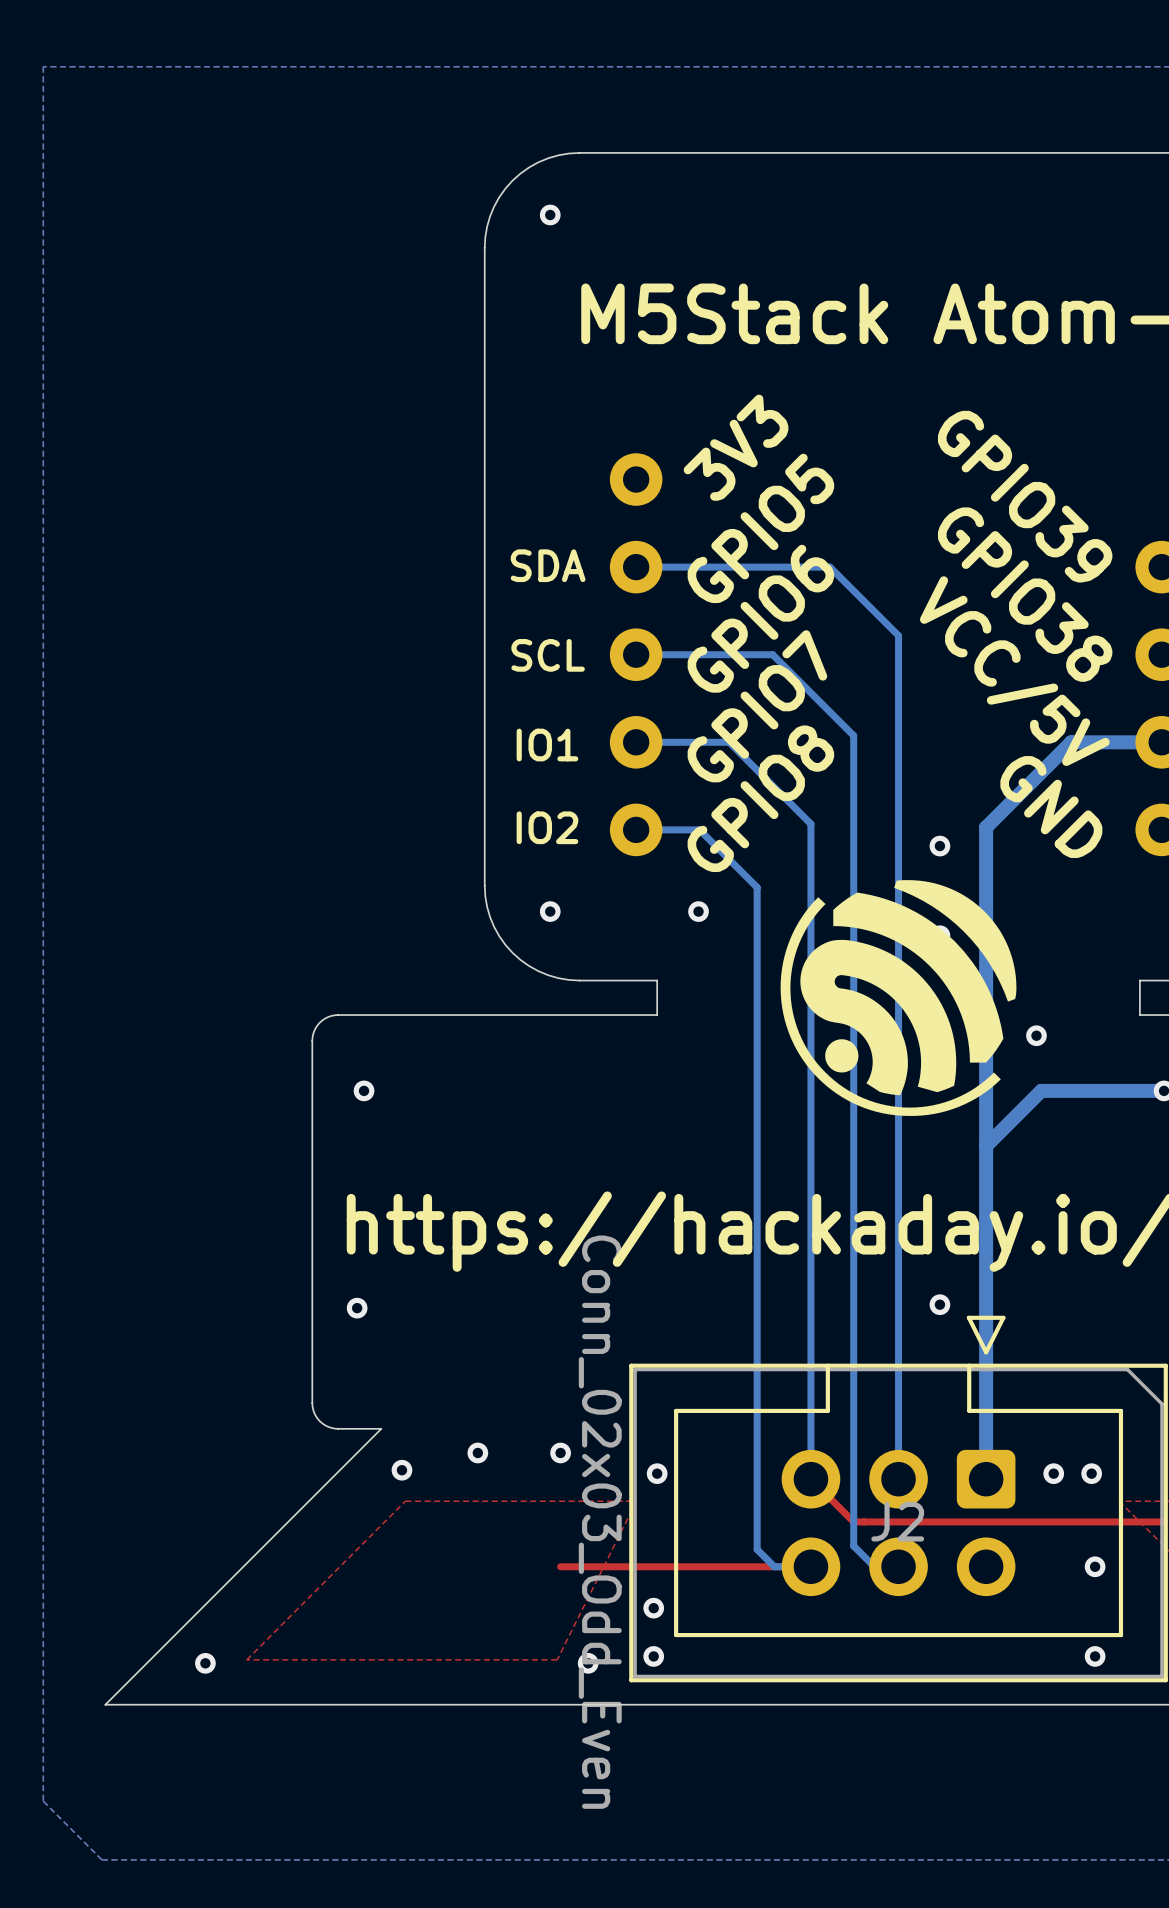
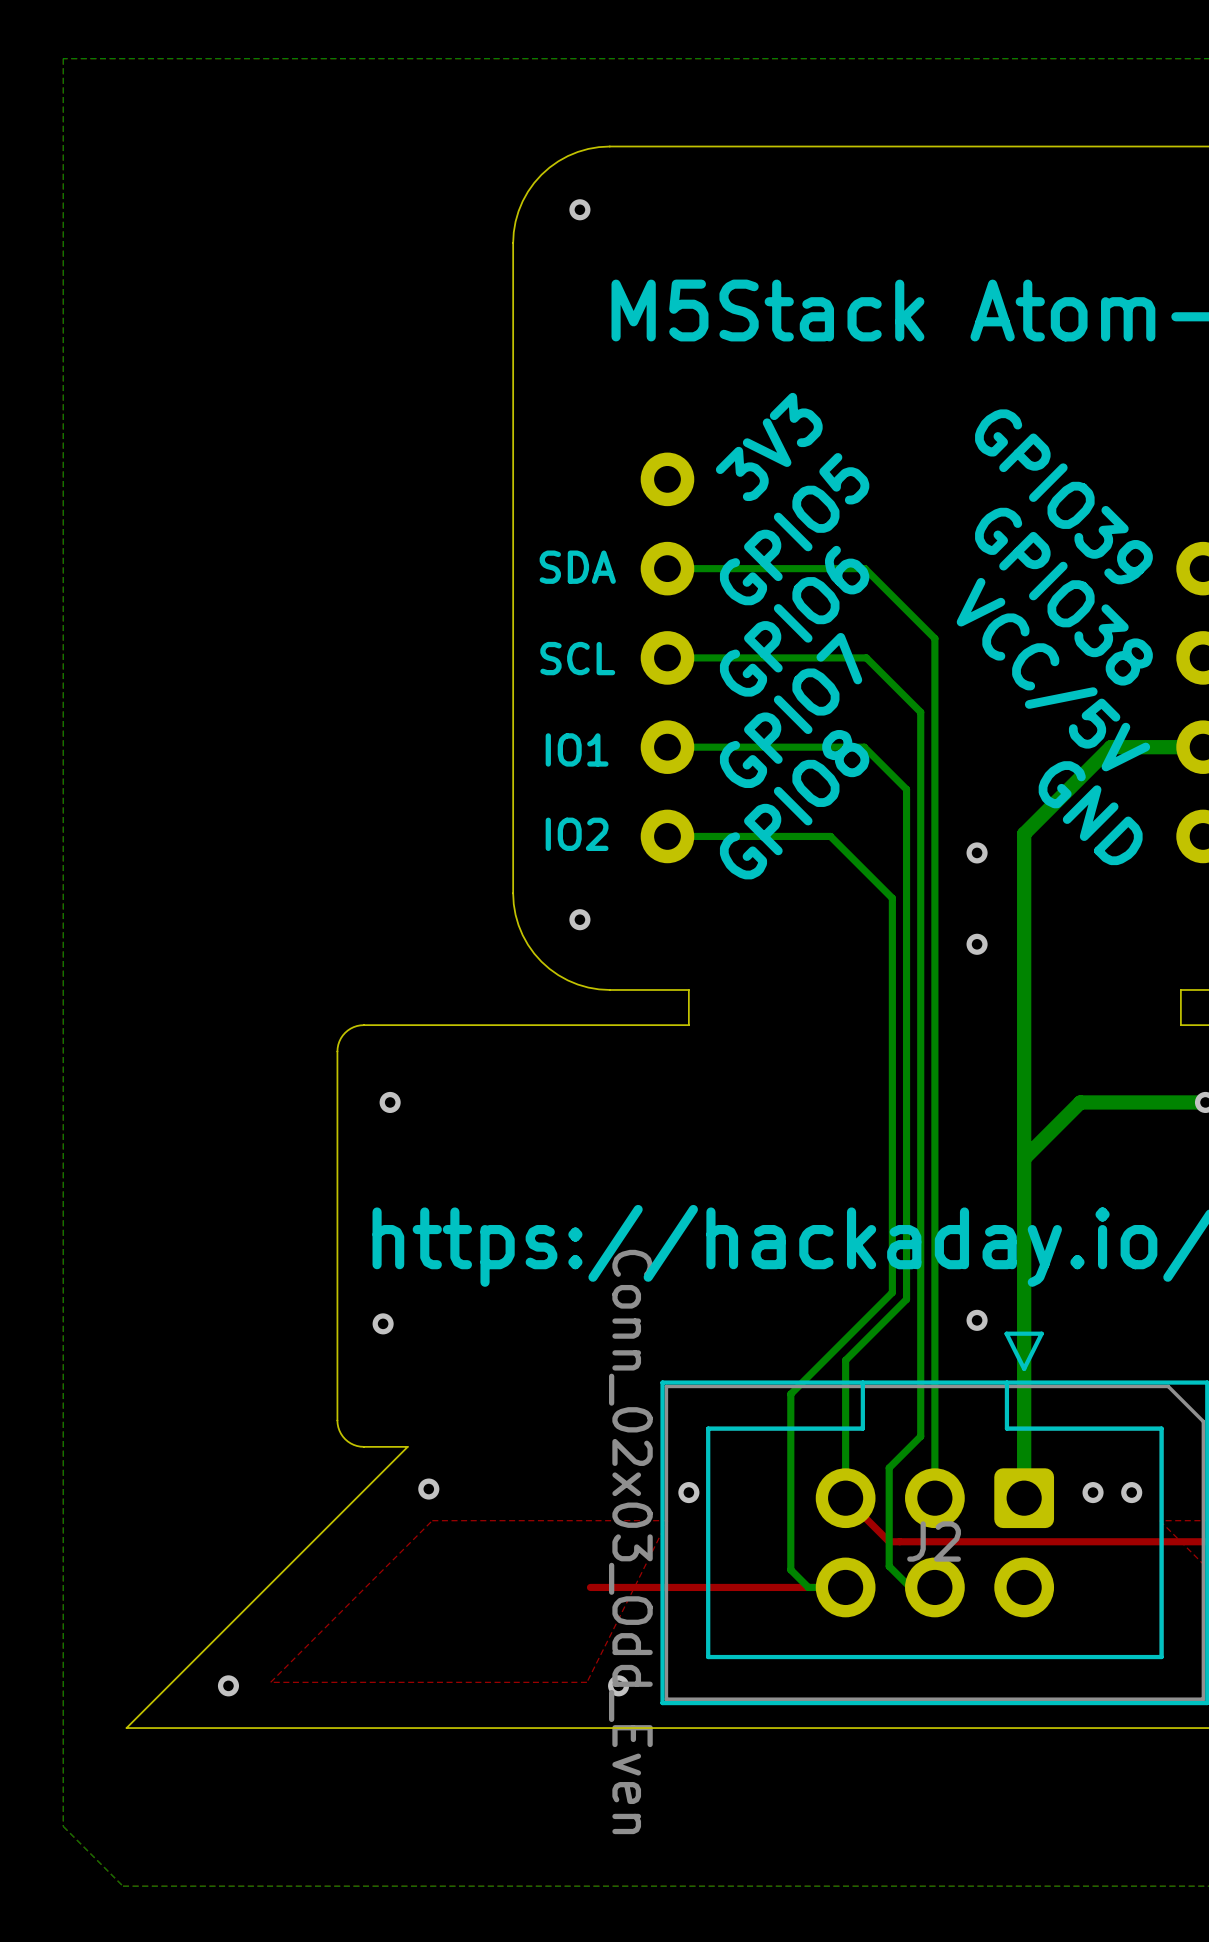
bottom track: (772, 654) (853, 735) (853, 1449) -> (806, 657) (866, 657) (920, 712) (920, 1436) (889, 1467)
bottom track: (729, 742) (810, 823) (810, 1343) -> (762, 747) (864, 747) (906, 789) (906, 1299) (845, 1360)
bottom track: (699, 829) (757, 887) (757, 1377) -> (732, 836) (830, 836) (892, 898) (892, 1292) (790, 1394)
drawing: [780, 880, 1017, 1116] -> none
via: (698, 911) -> none
via: (1036, 1035) -> none
via: (477, 1452) -> none
via: (560, 1452) -> none
via: (1095, 1566) -> none
via: (653, 1608) -> none
via: (653, 1656) -> none
via: (1095, 1656) -> none

